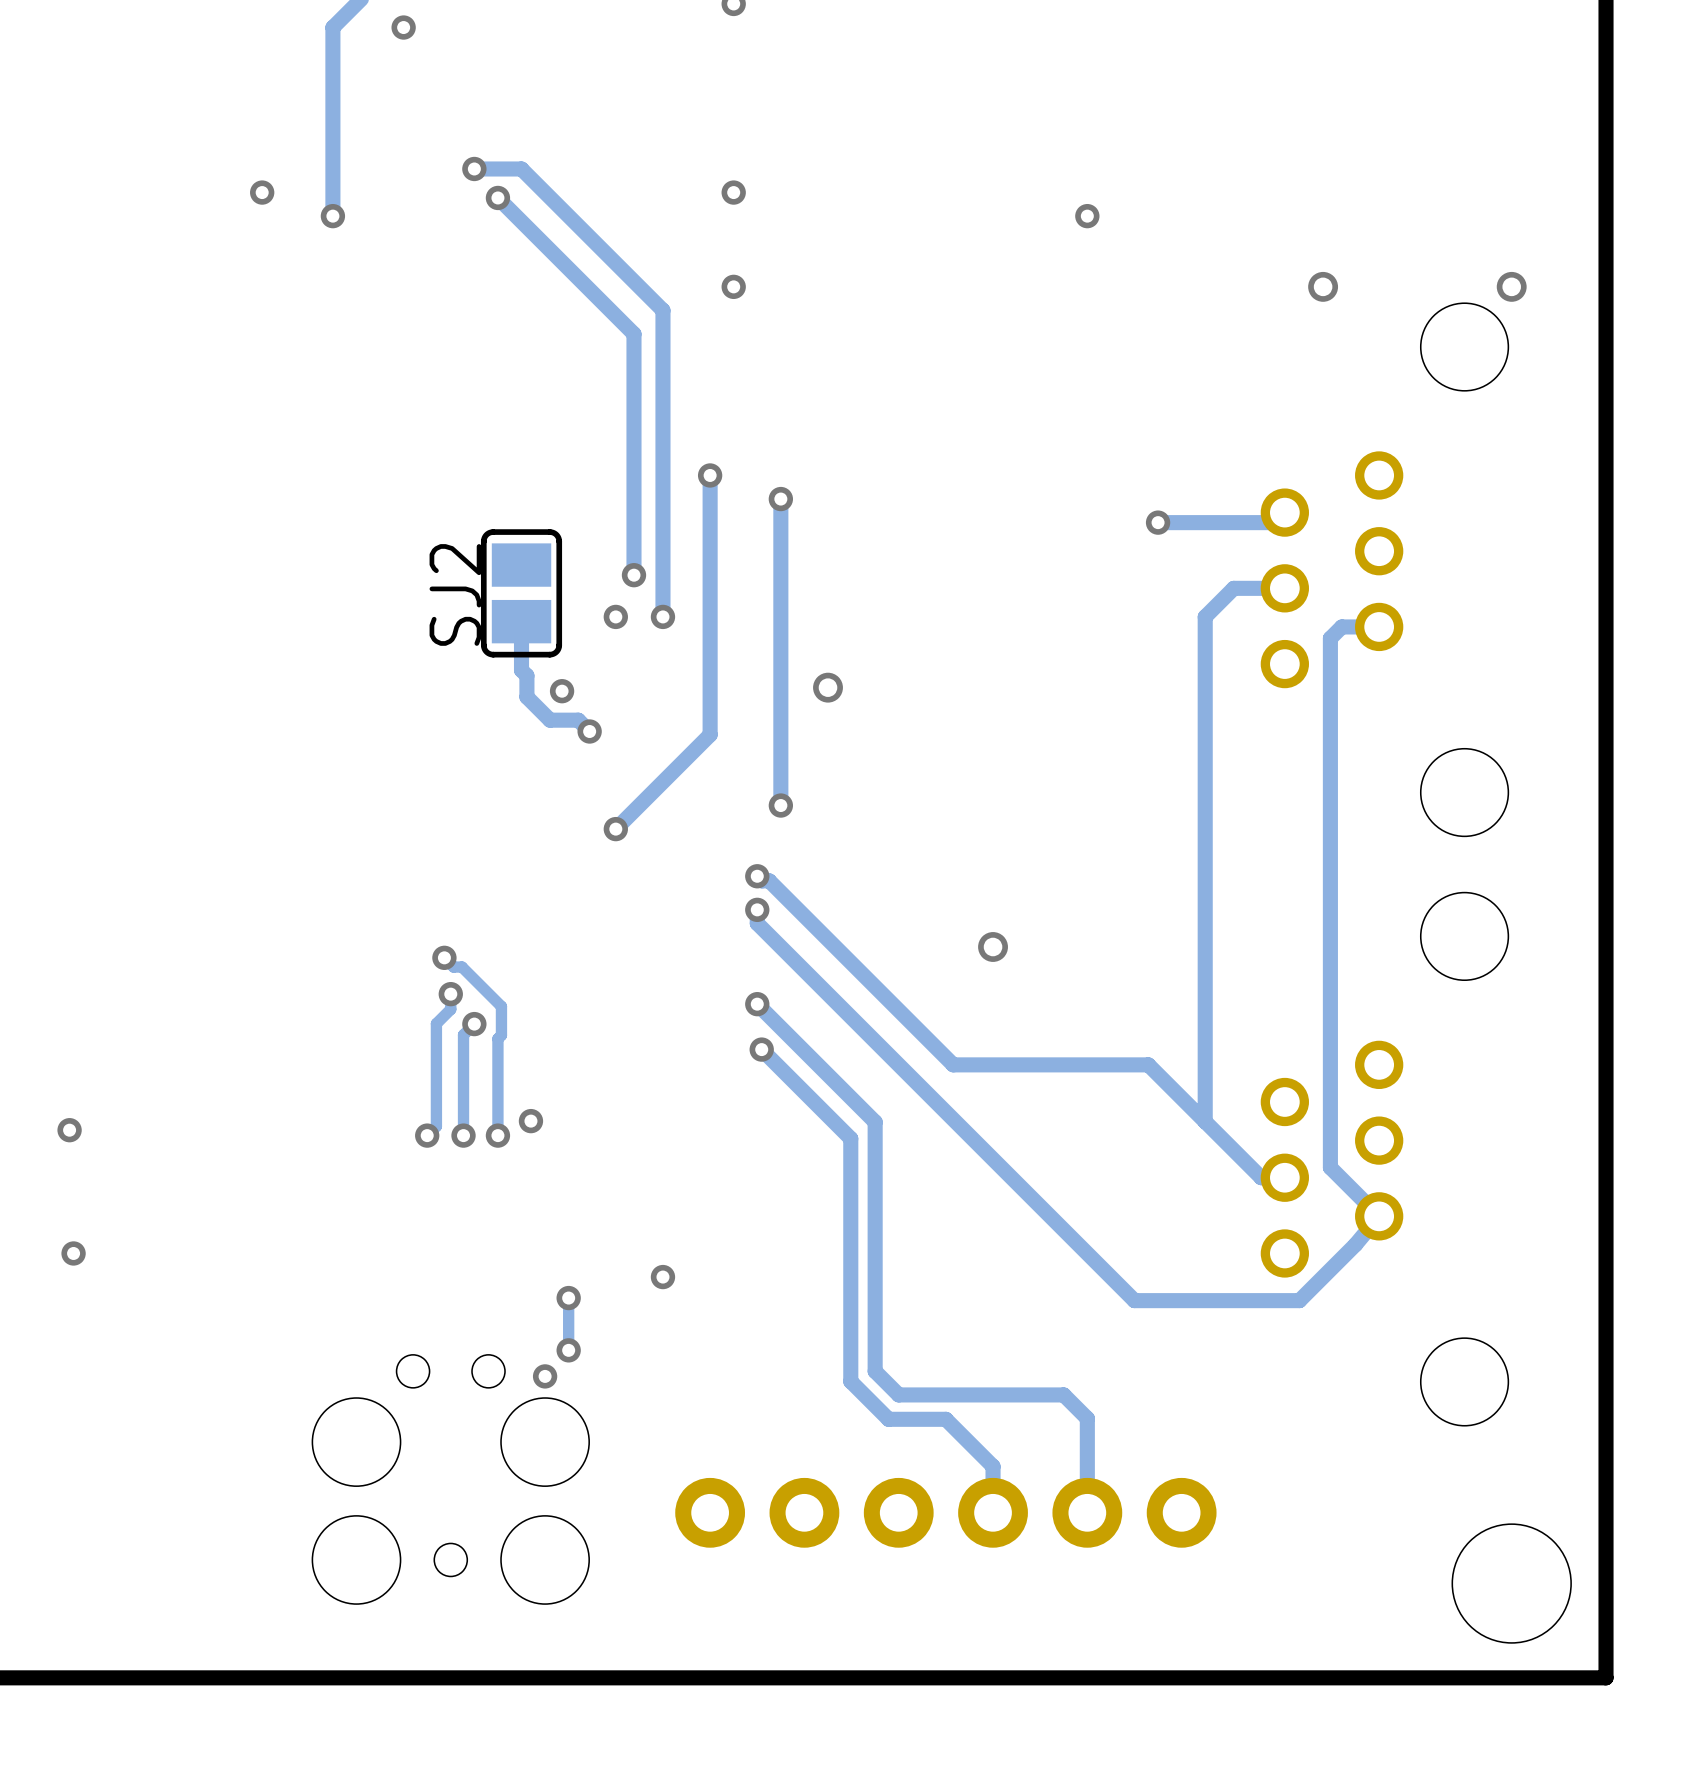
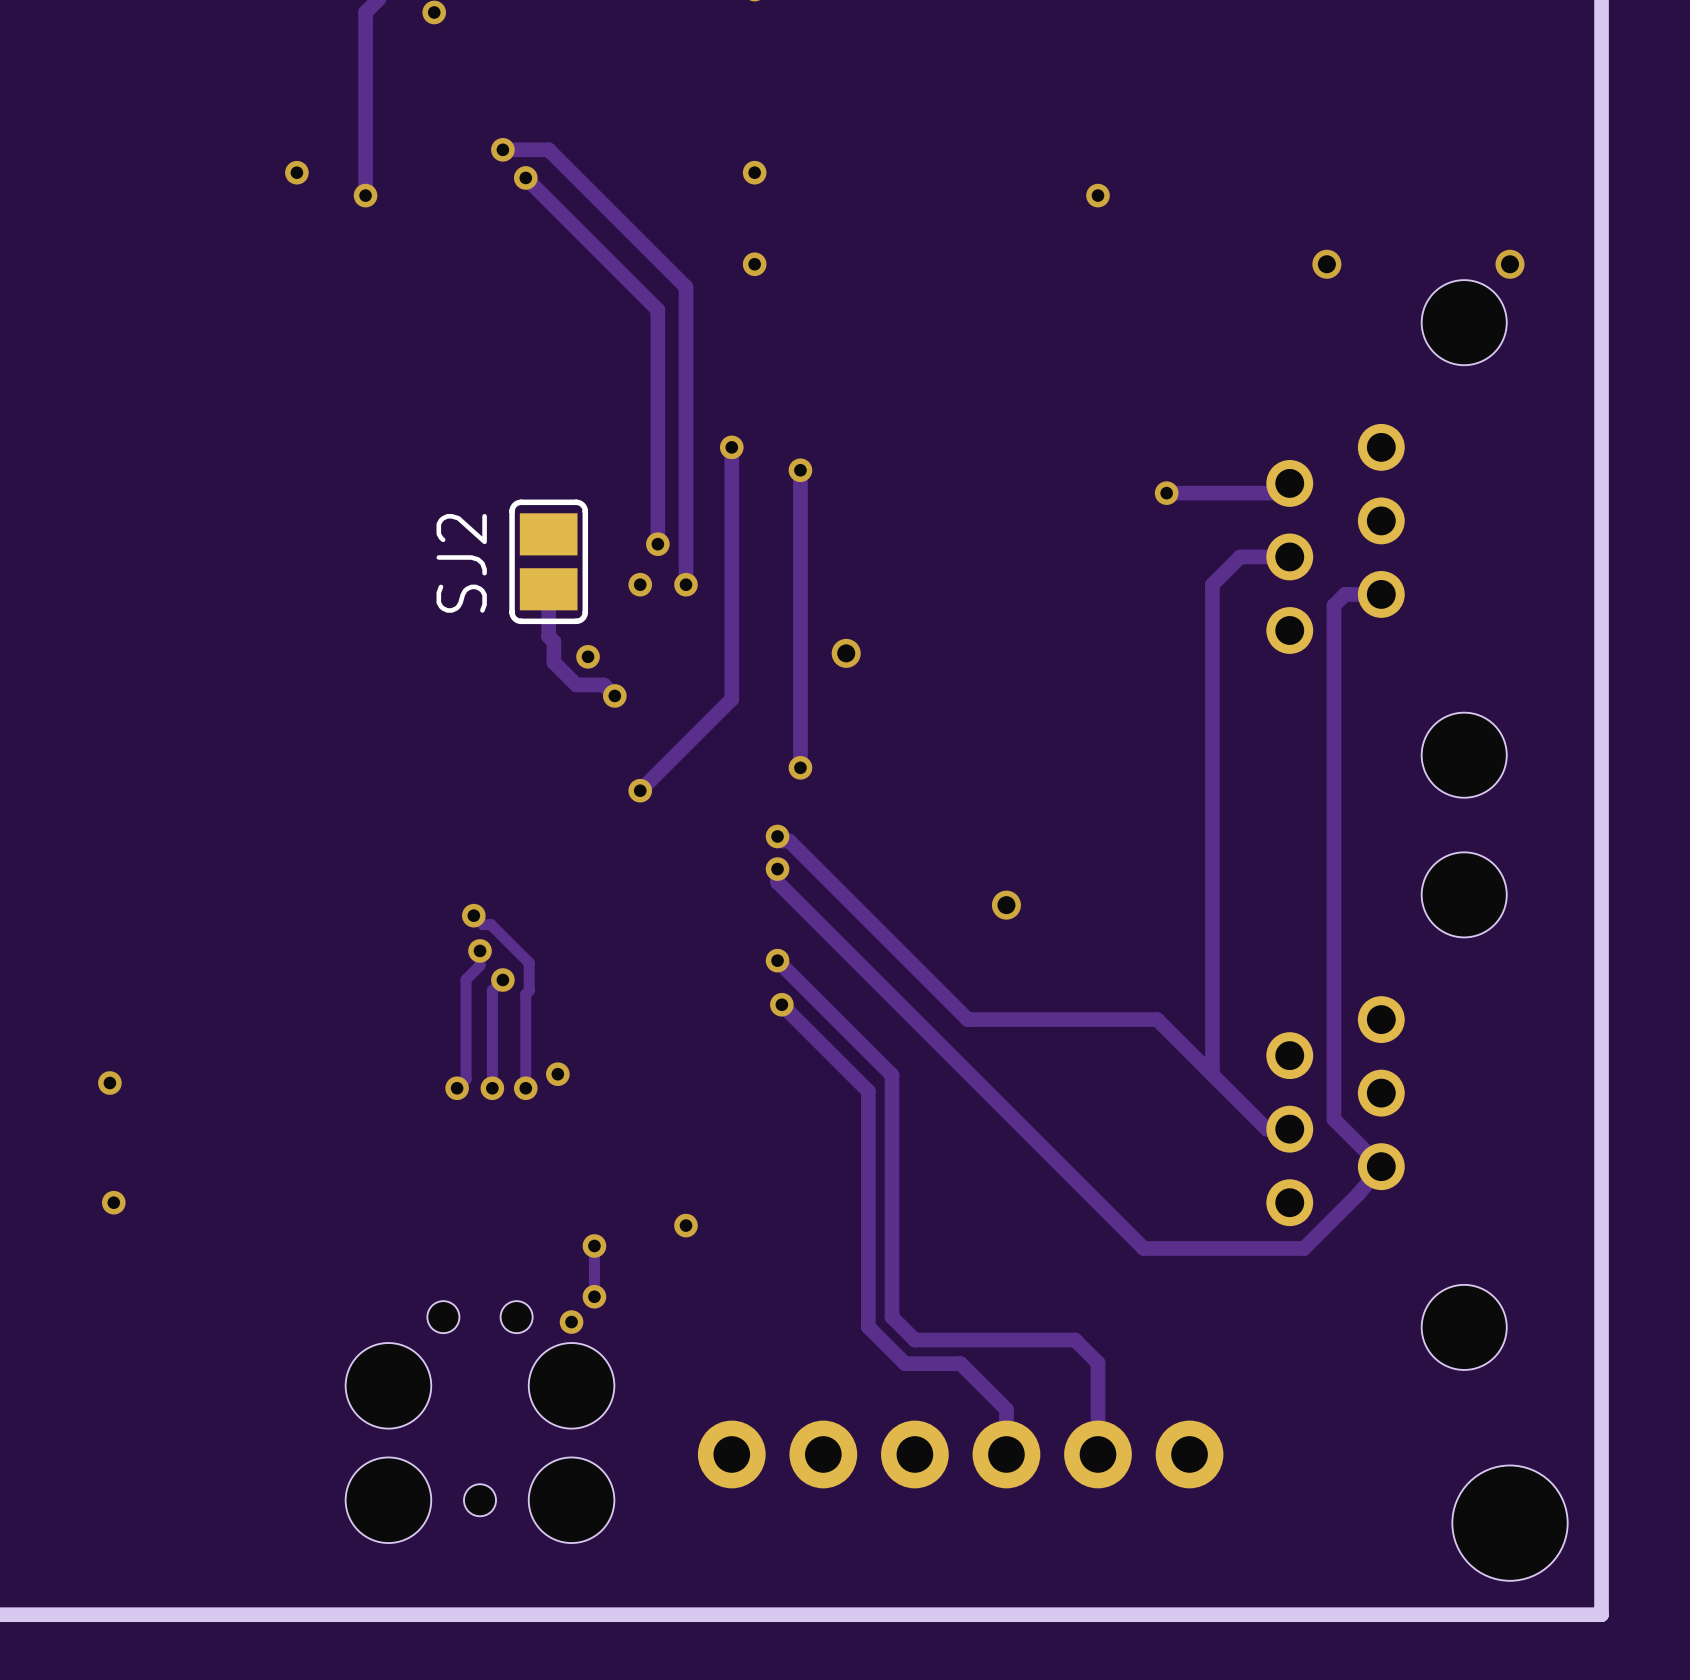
SJ2 name position: SJ2 (455, 594) -> SJ2 (461, 563)

